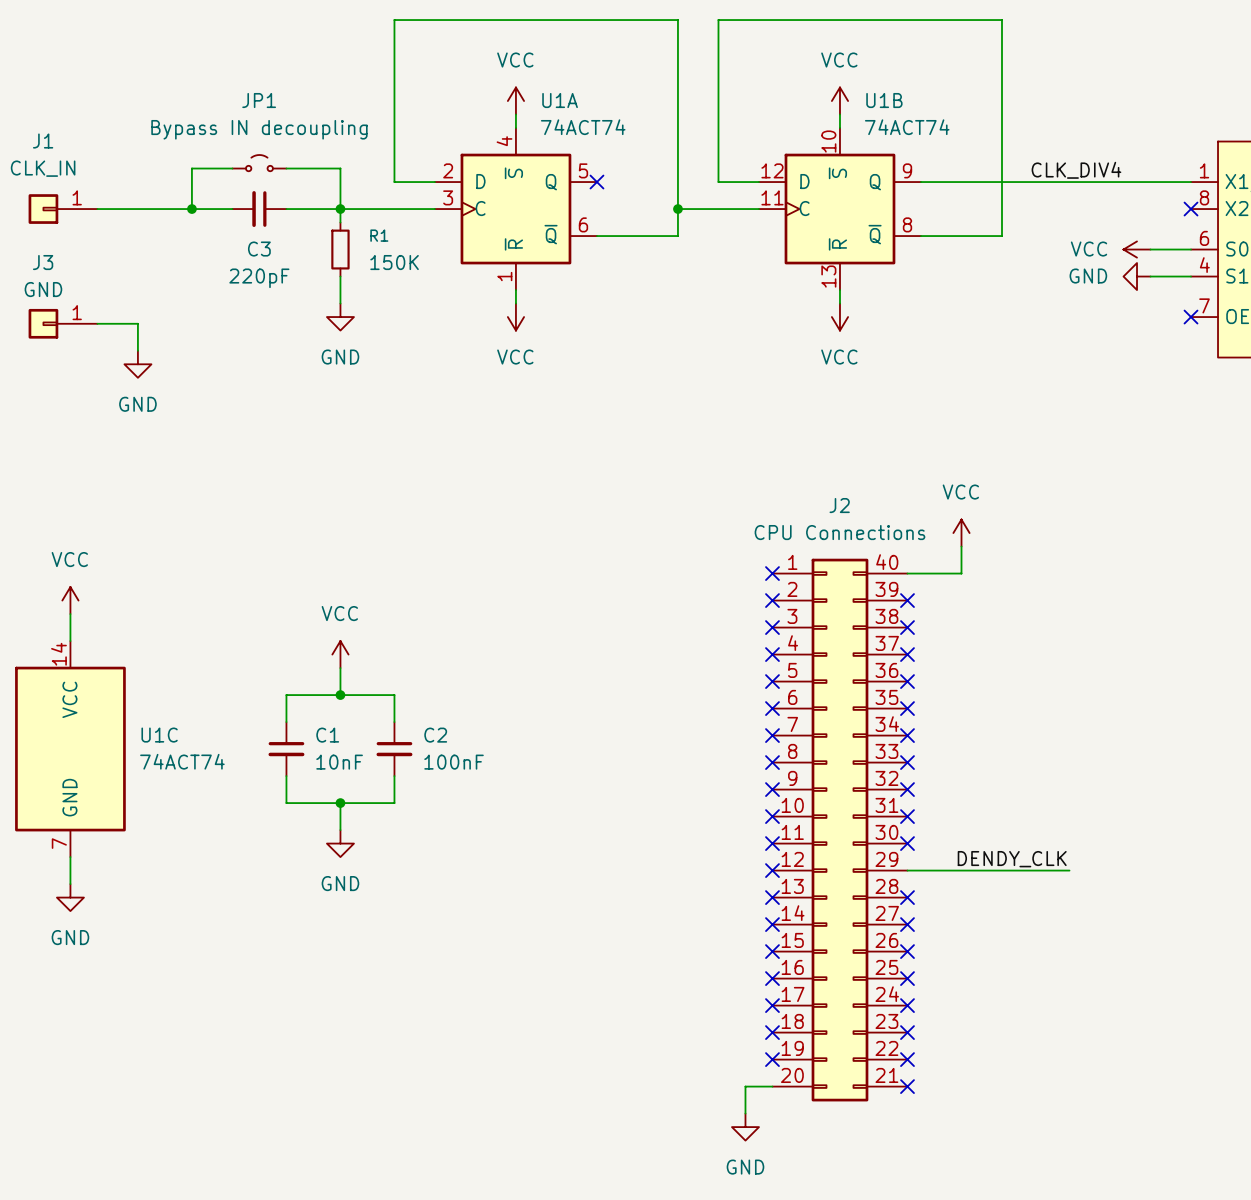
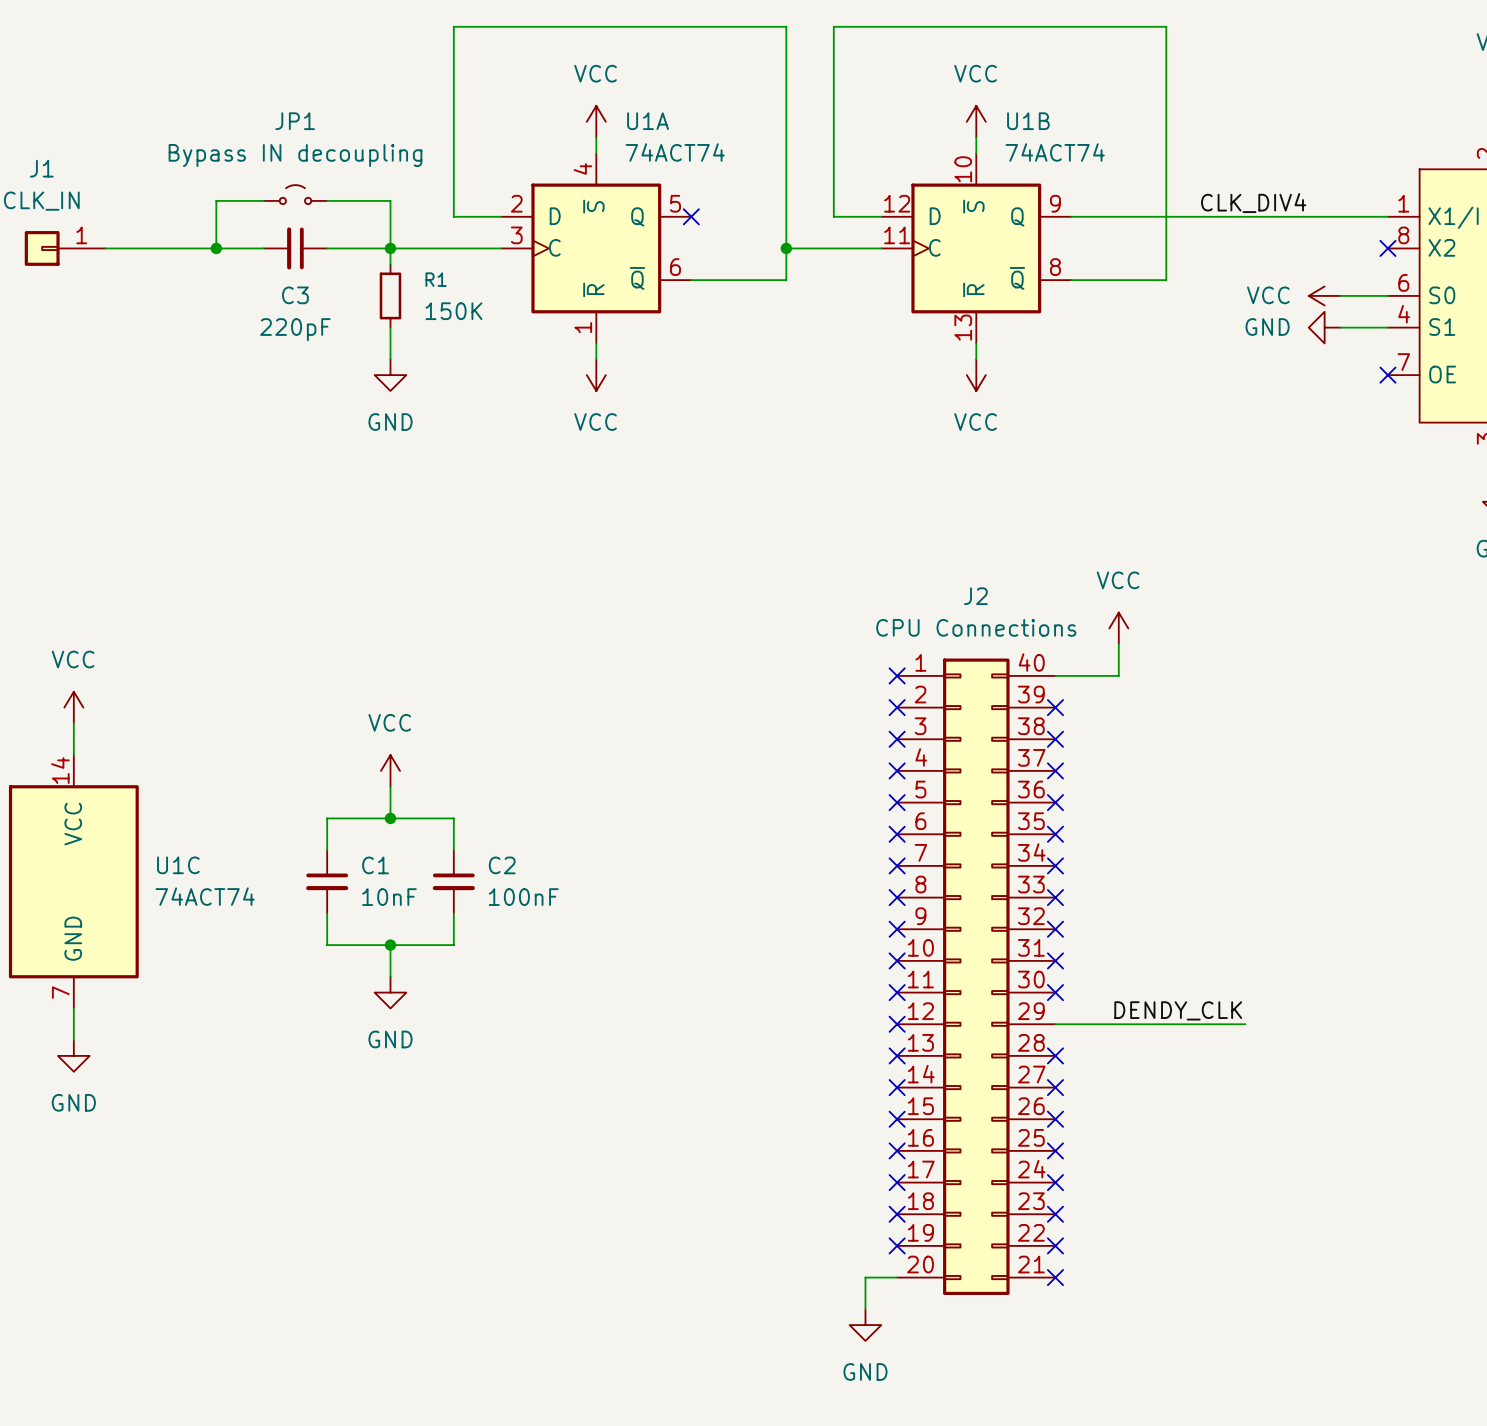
J3: GND (63, 323) -> none
wire: (97, 323) (137, 323) (137, 350) -> none
power symbol: GND (137, 364) -> none

